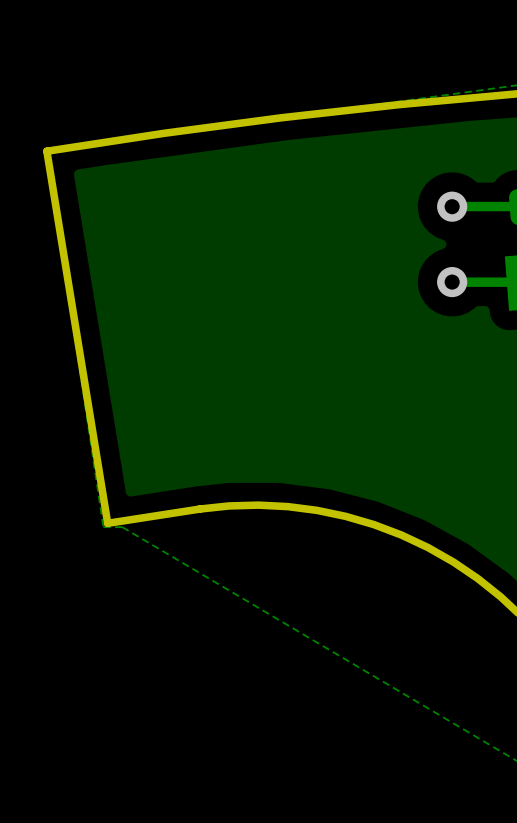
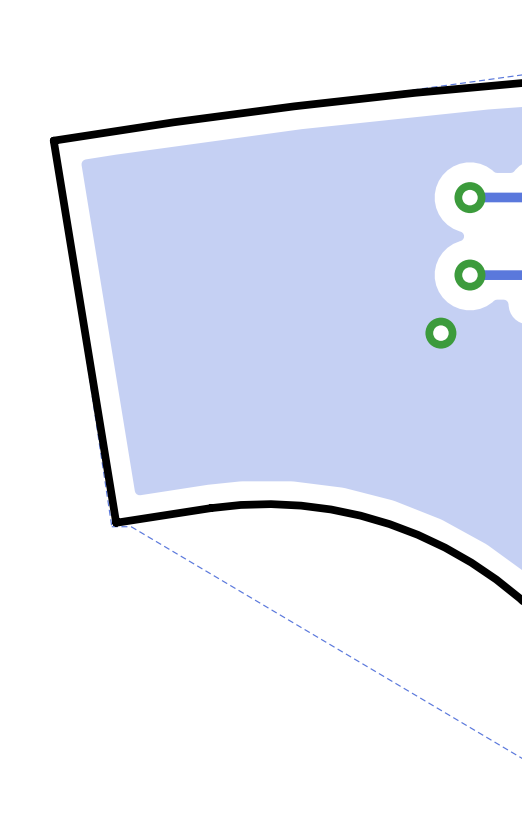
via: none -> (440, 333)

